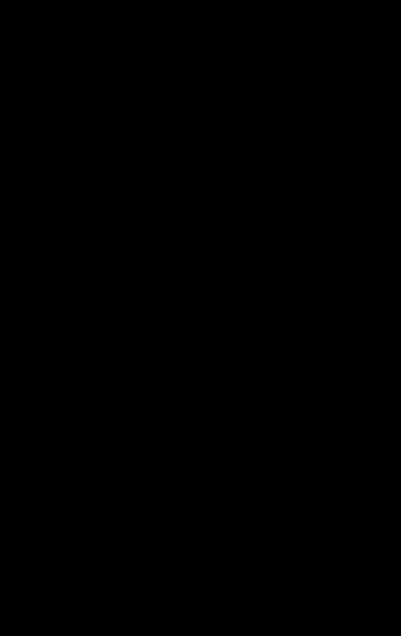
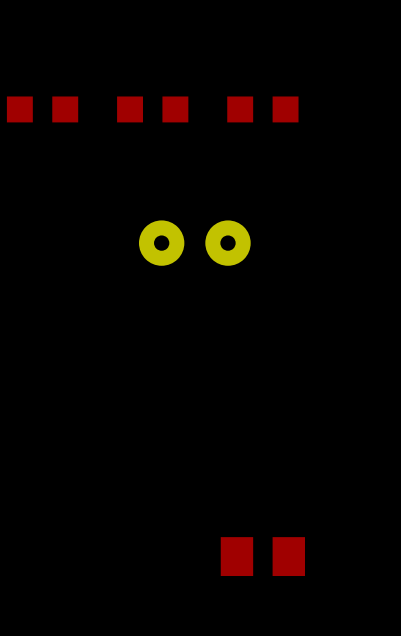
part: none -> (42, 109)
part: none -> (152, 109)
part: none -> (262, 109)
part: none -> (194, 243)
part: none -> (262, 556)

